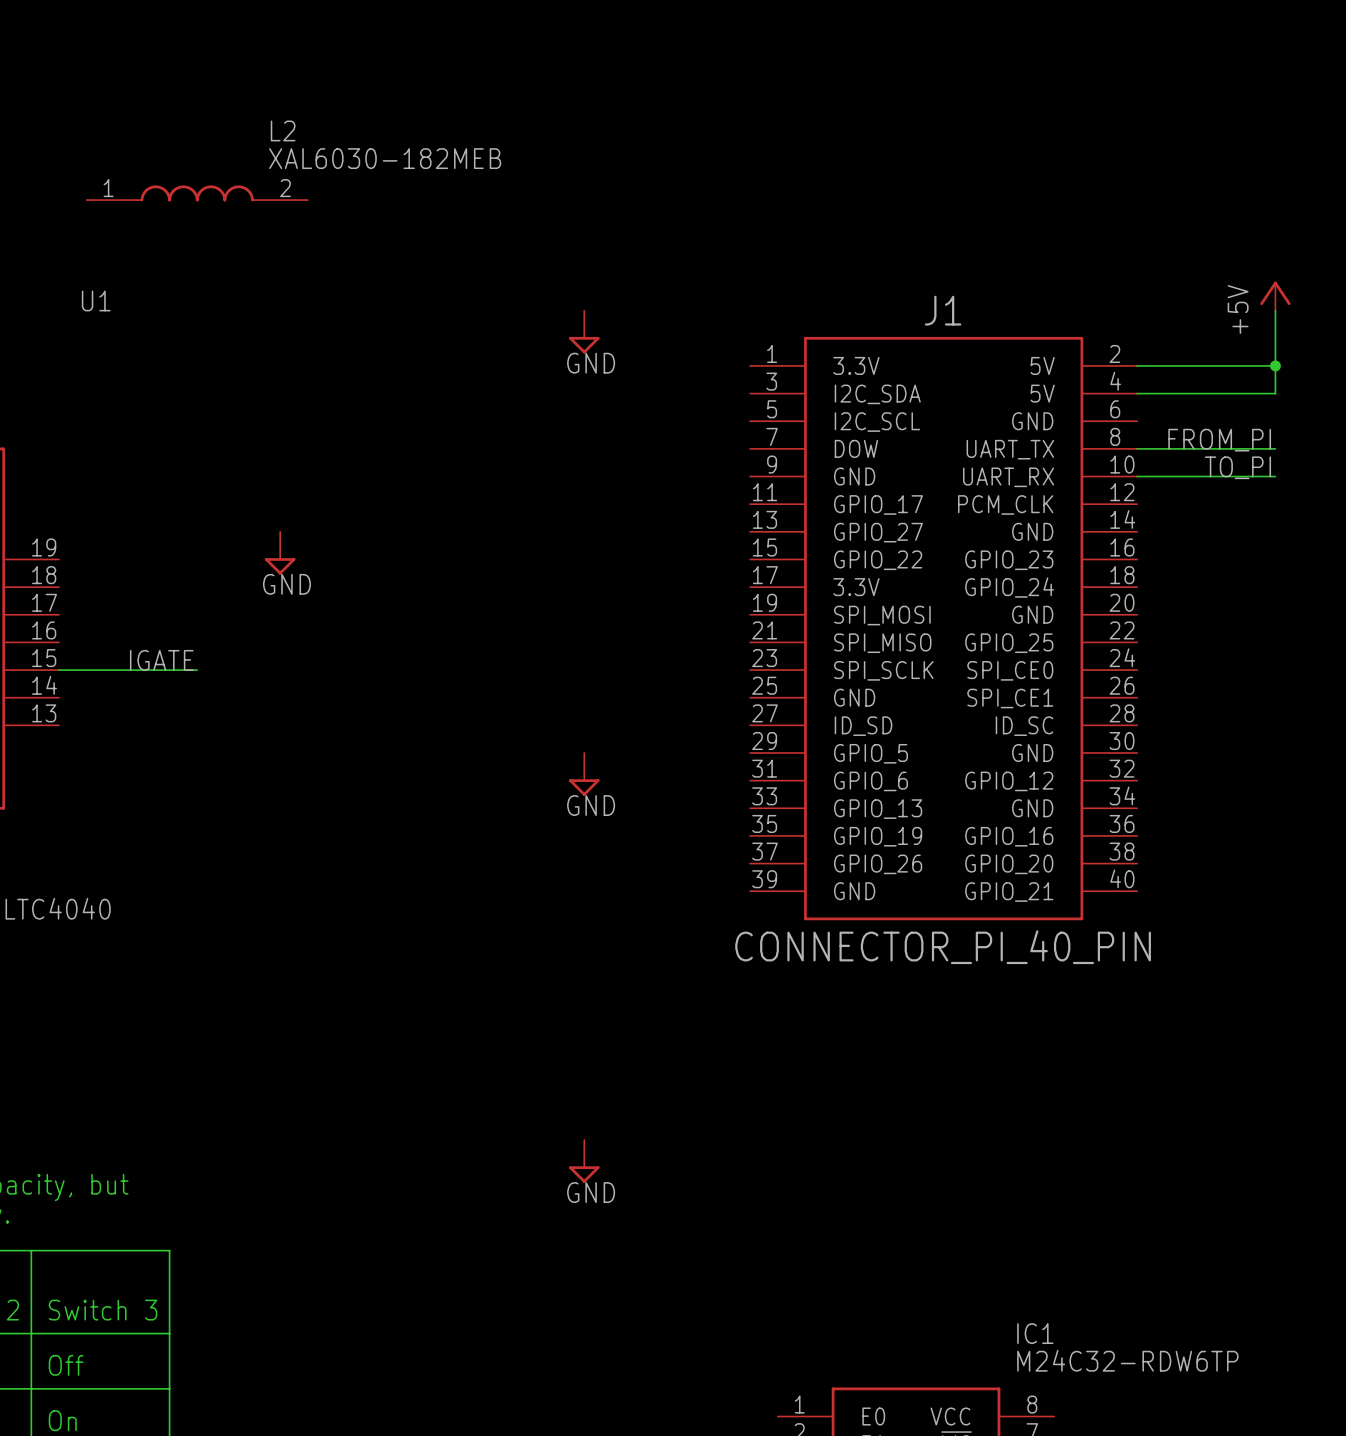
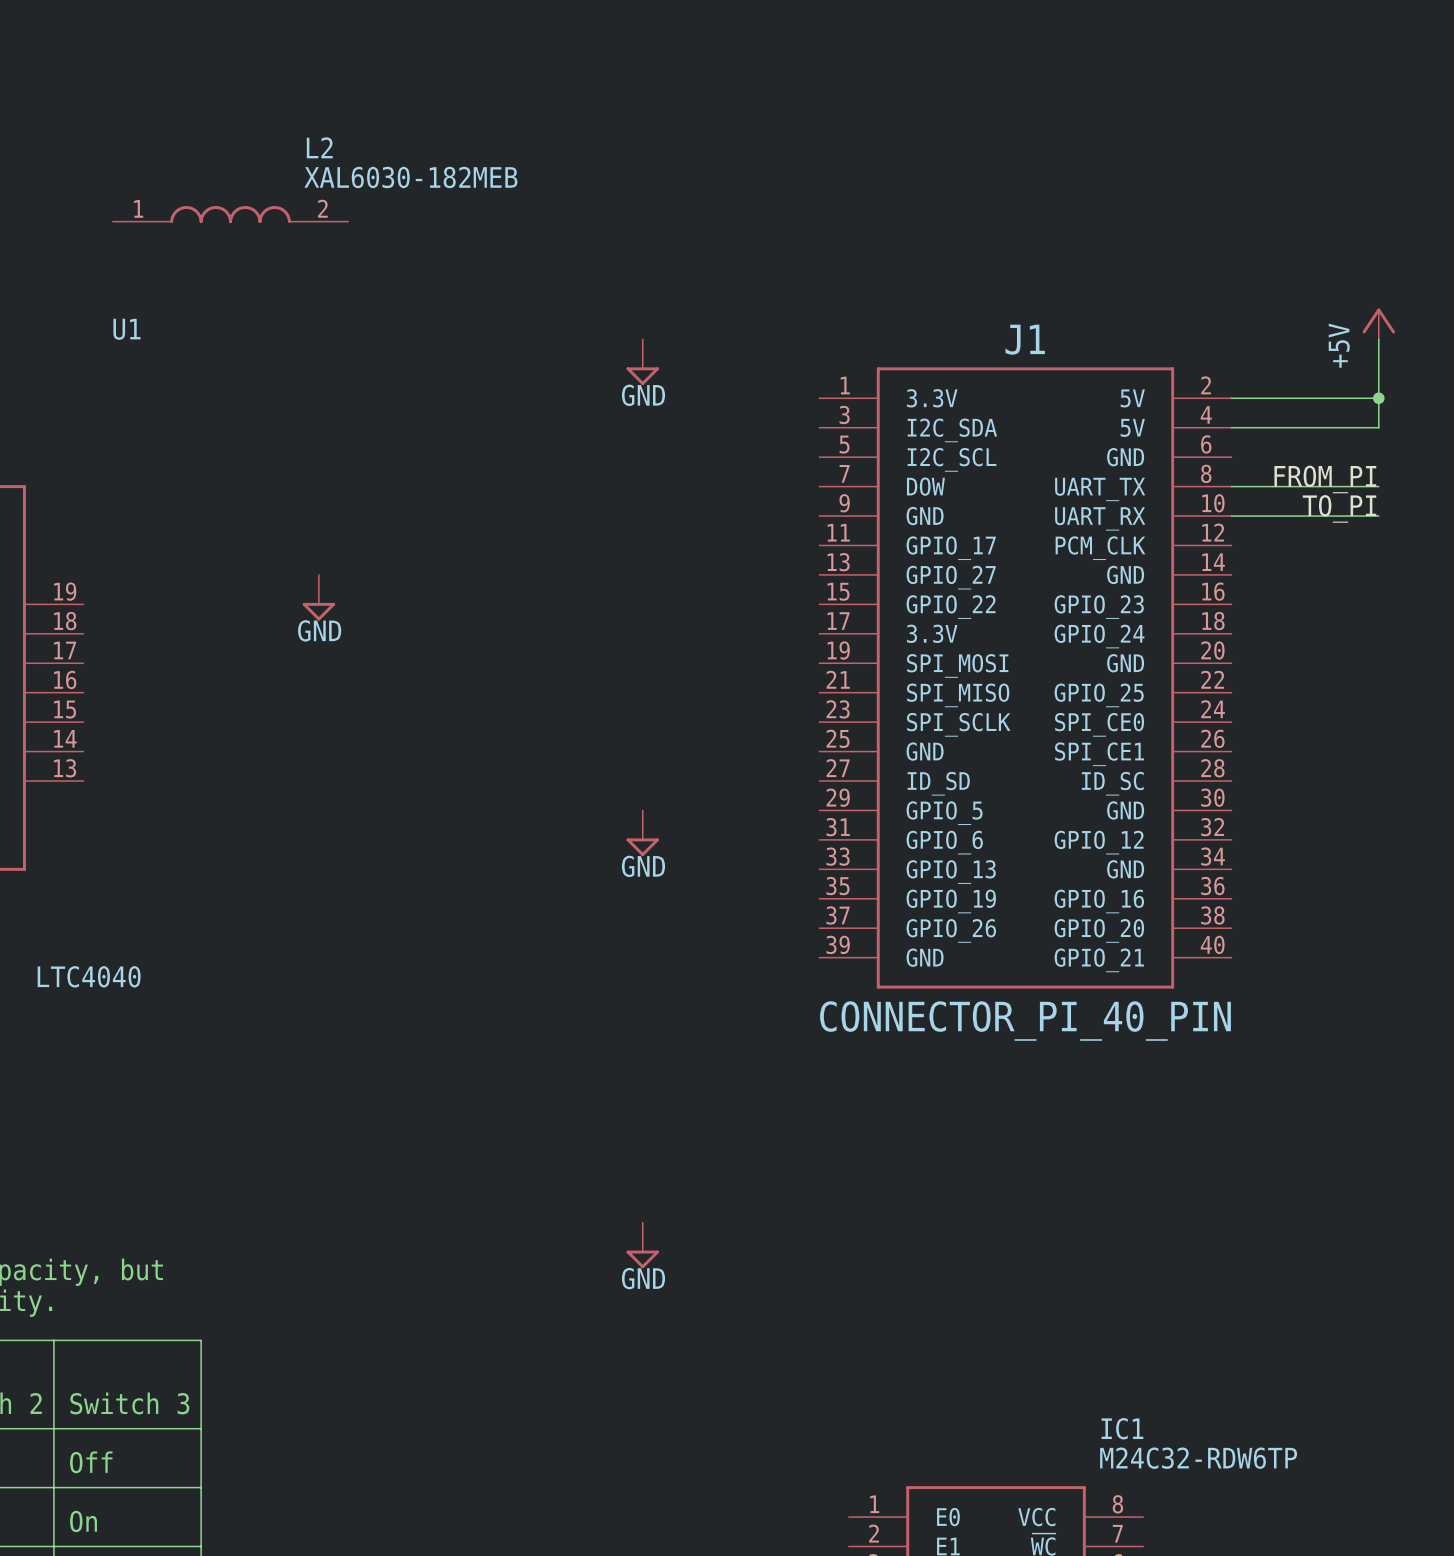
label: IGATE (161, 660) -> none
wire: (58, 670) (197, 670) -> none

